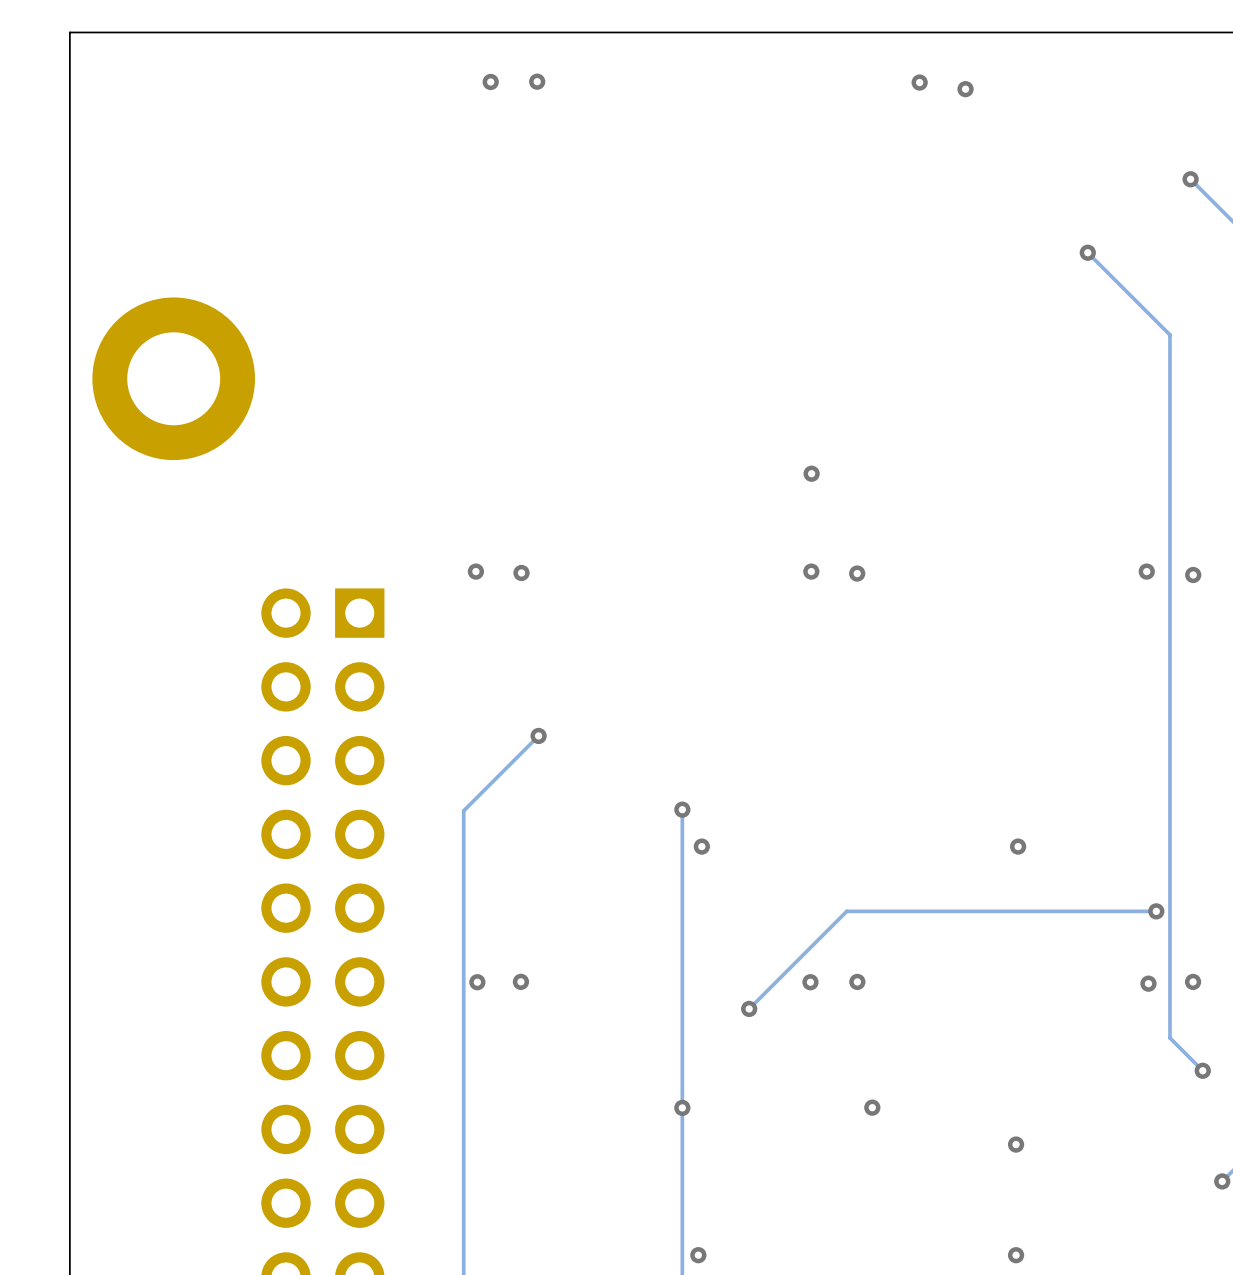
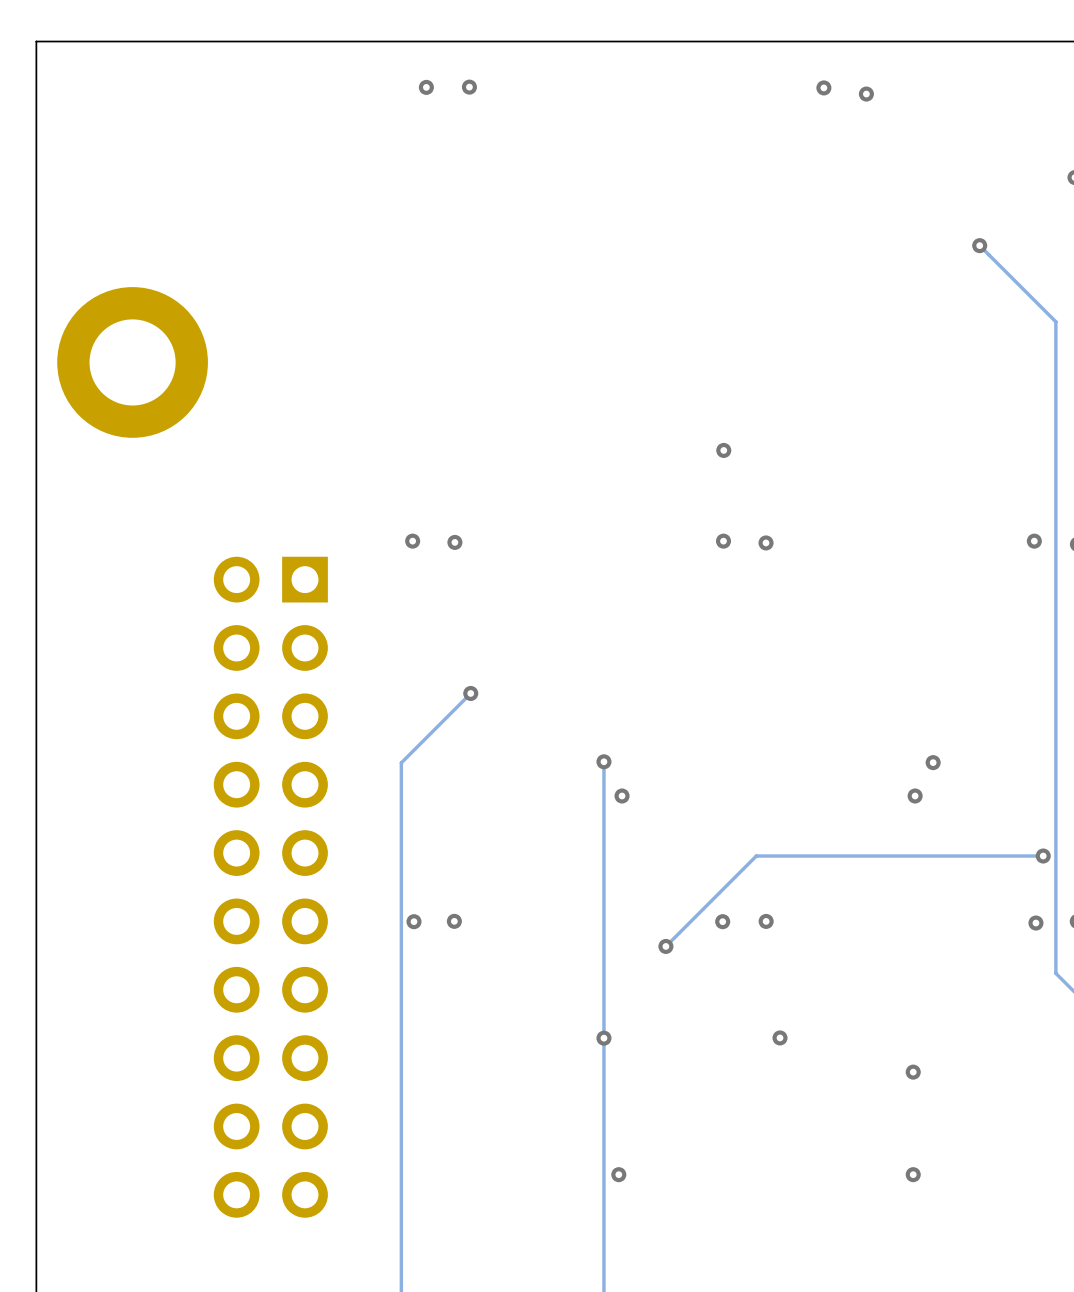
via: none -> (933, 762)

